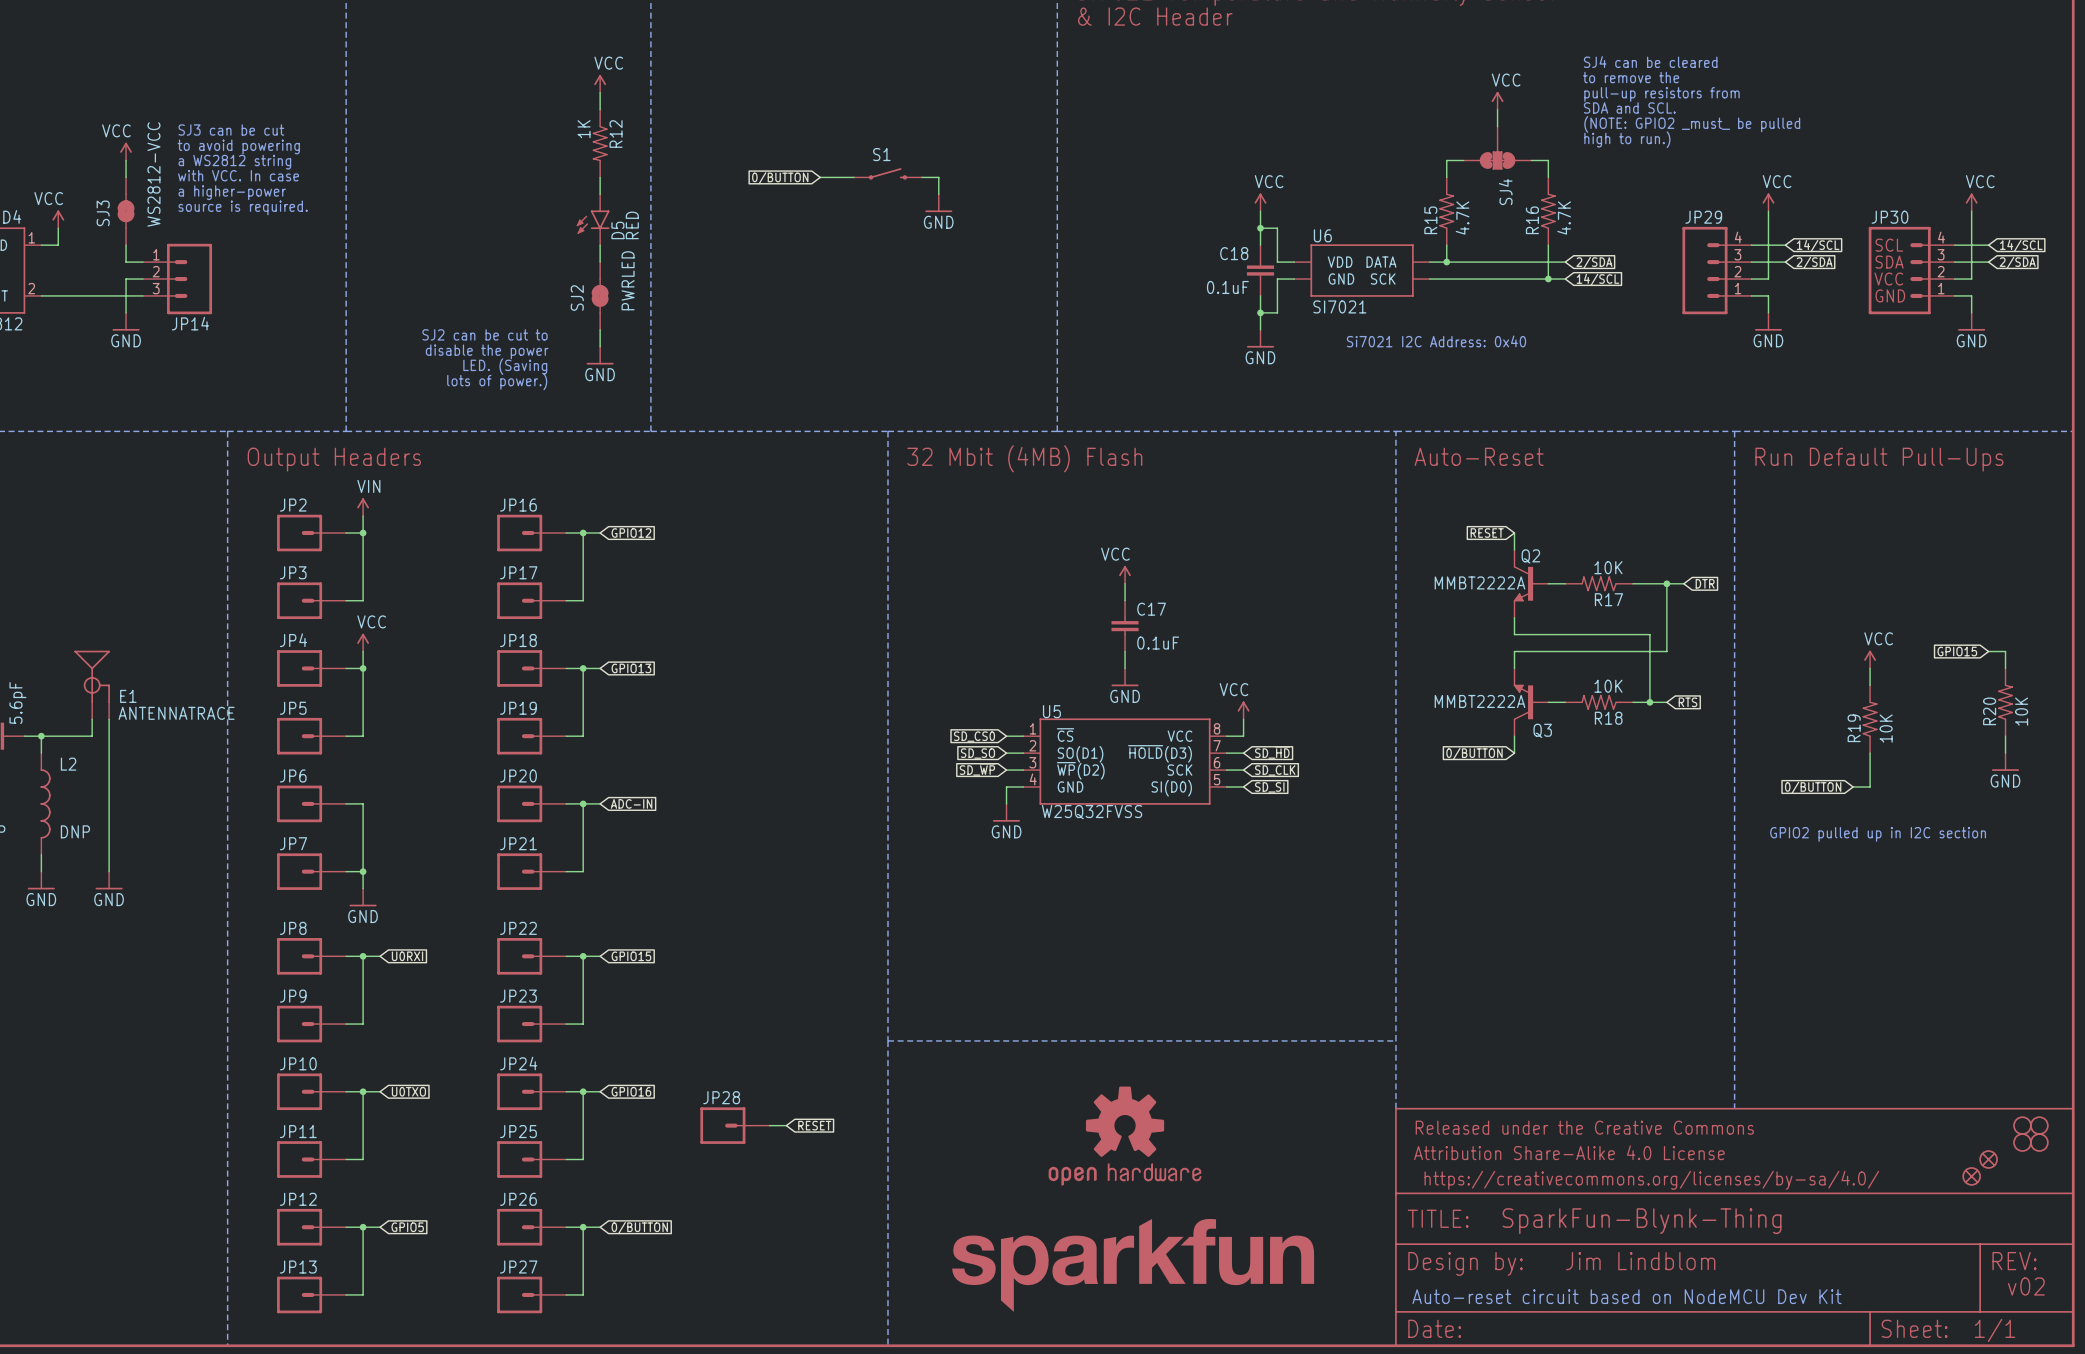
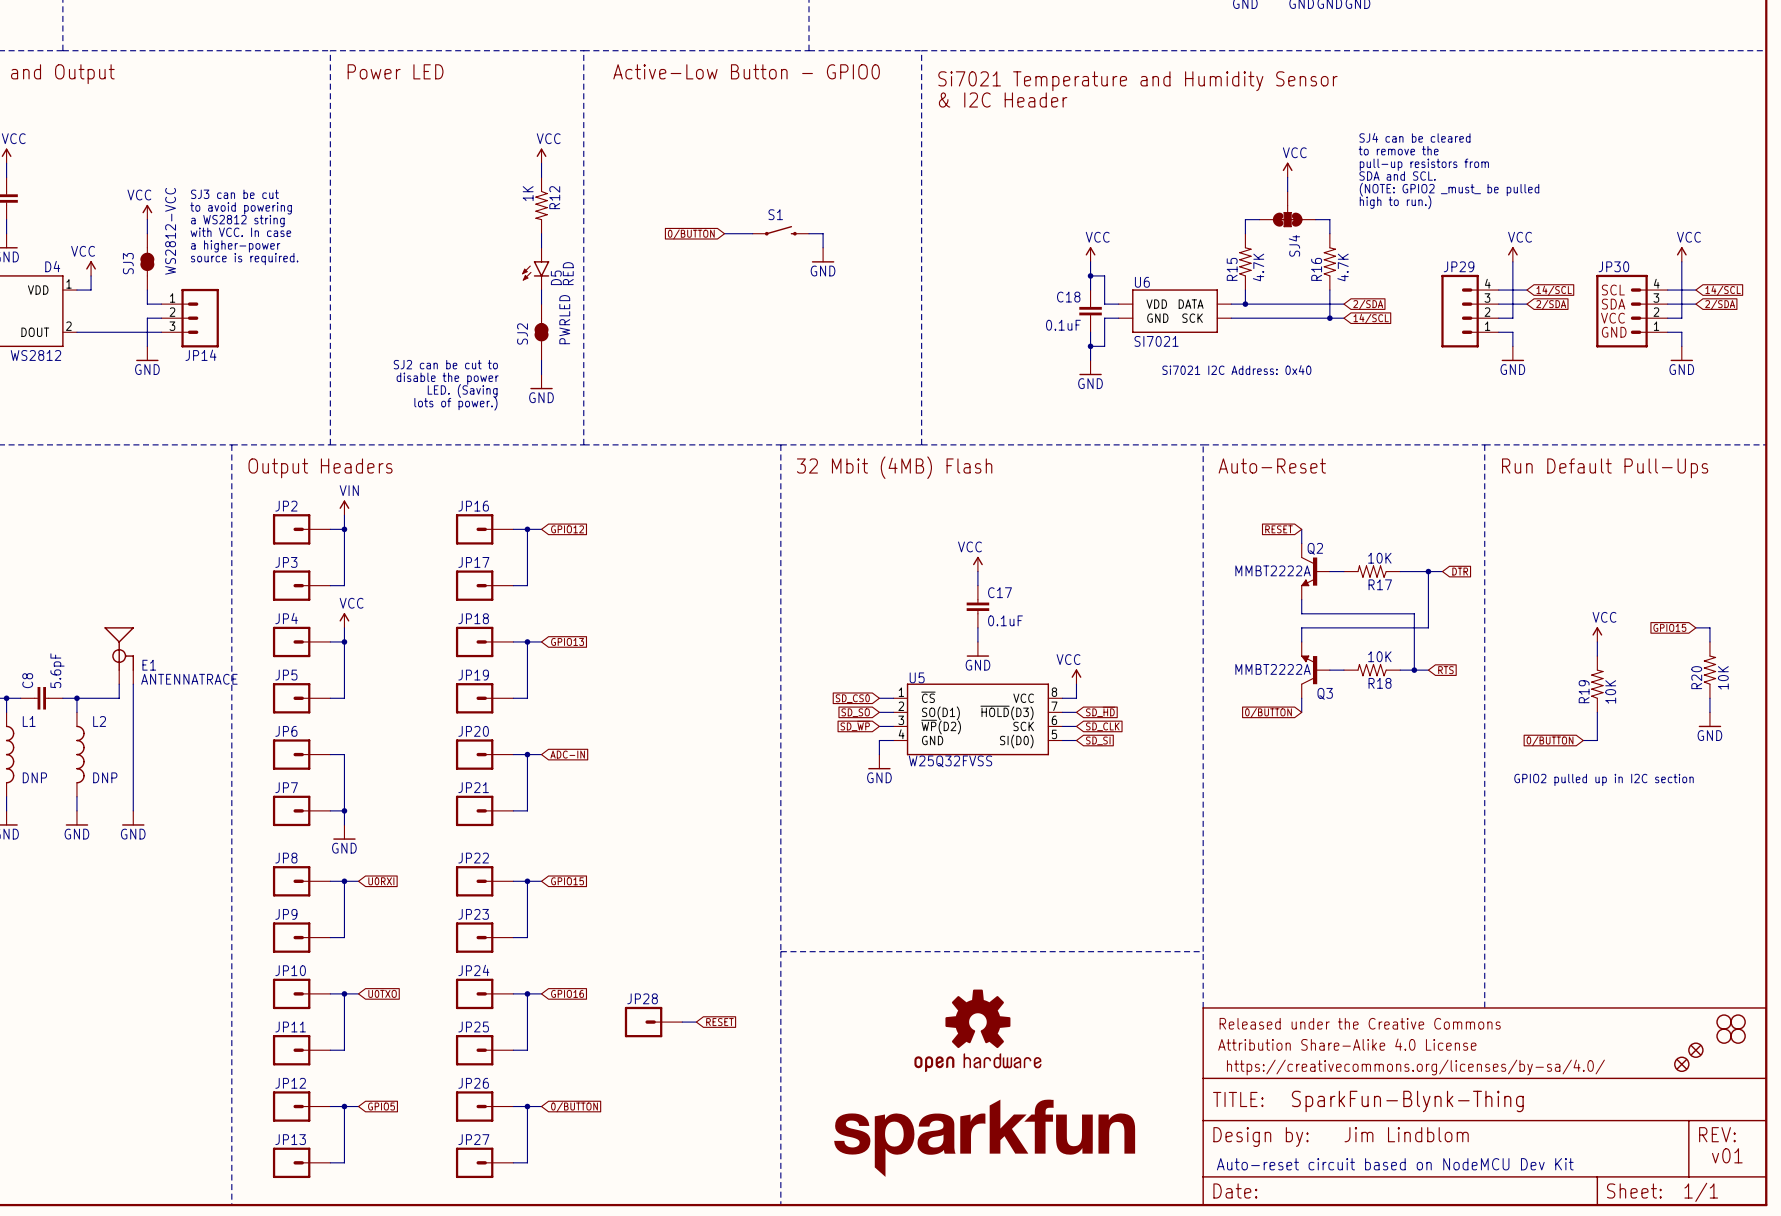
text: v02 (2026, 1286) -> v01 (1727, 1155)

